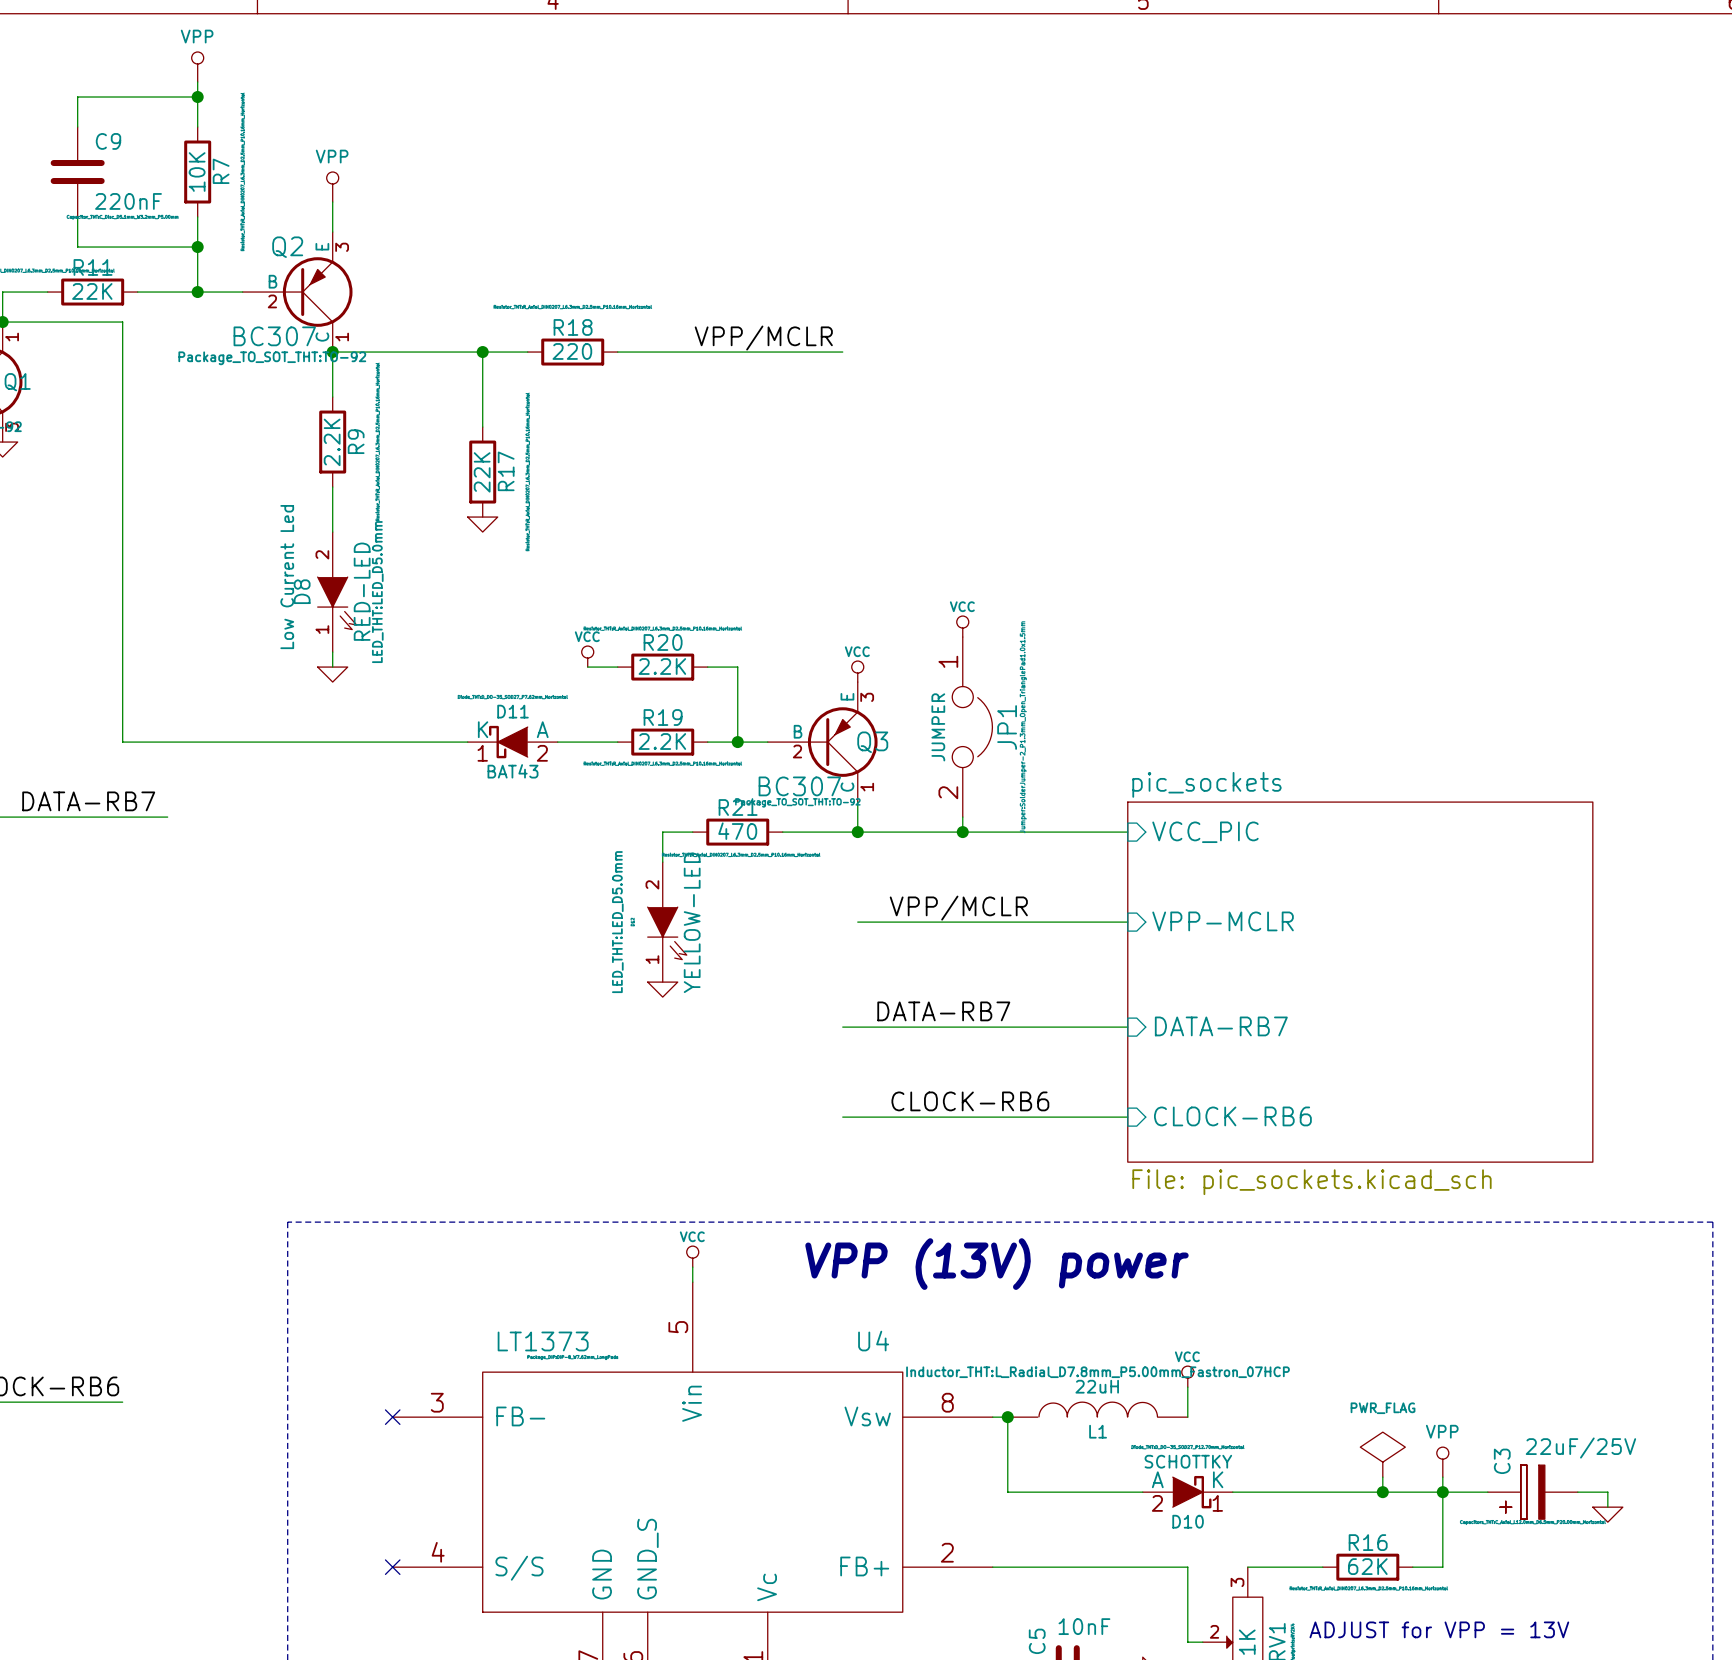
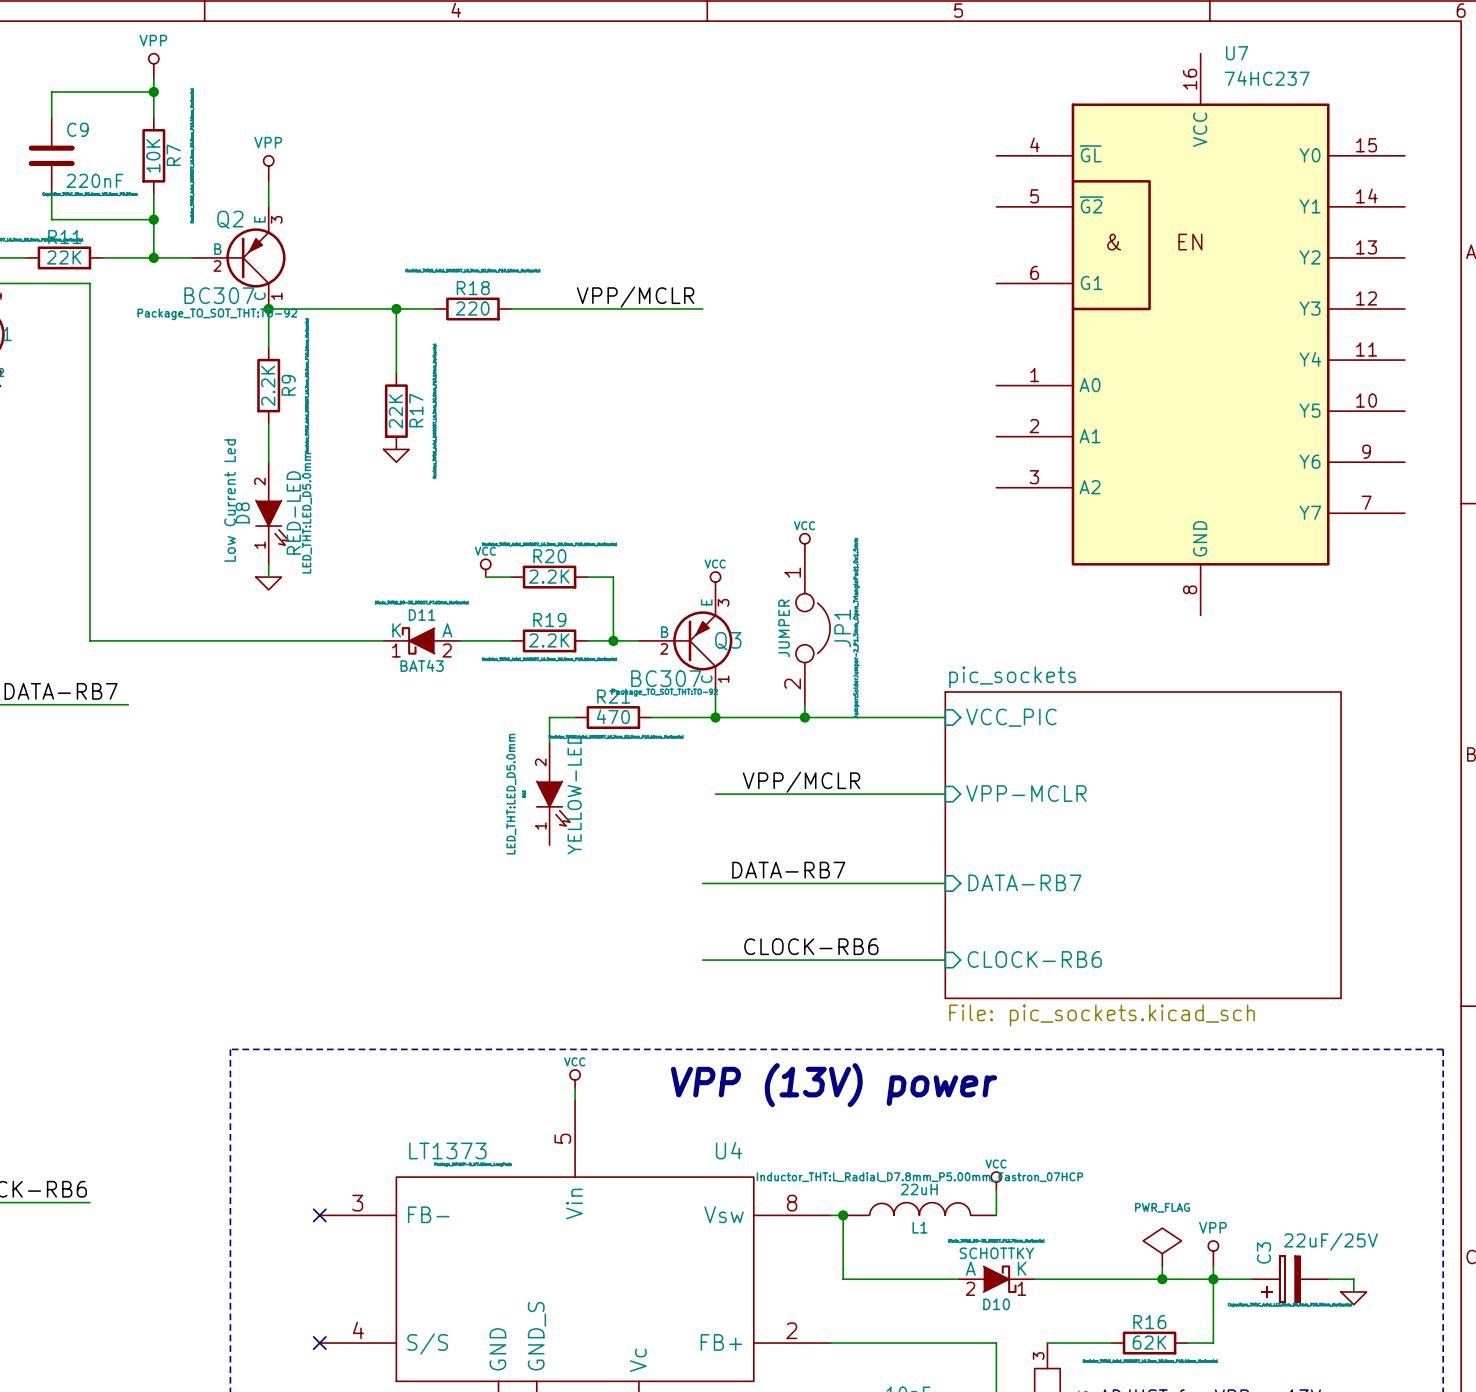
U7: none -> 74HC237 (1200, 334)
power symbol: (662, 989) -> none

